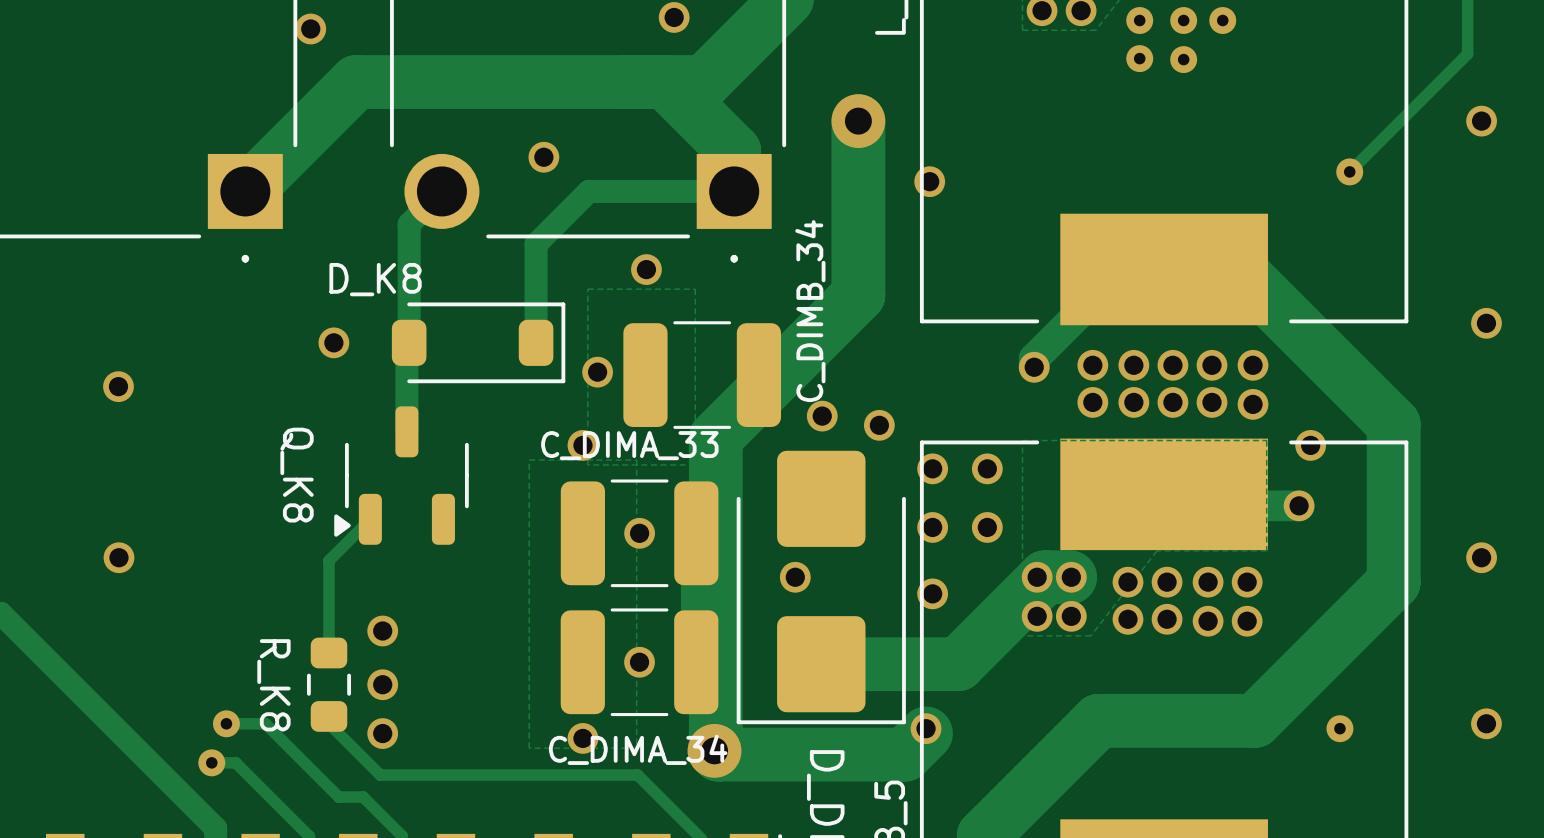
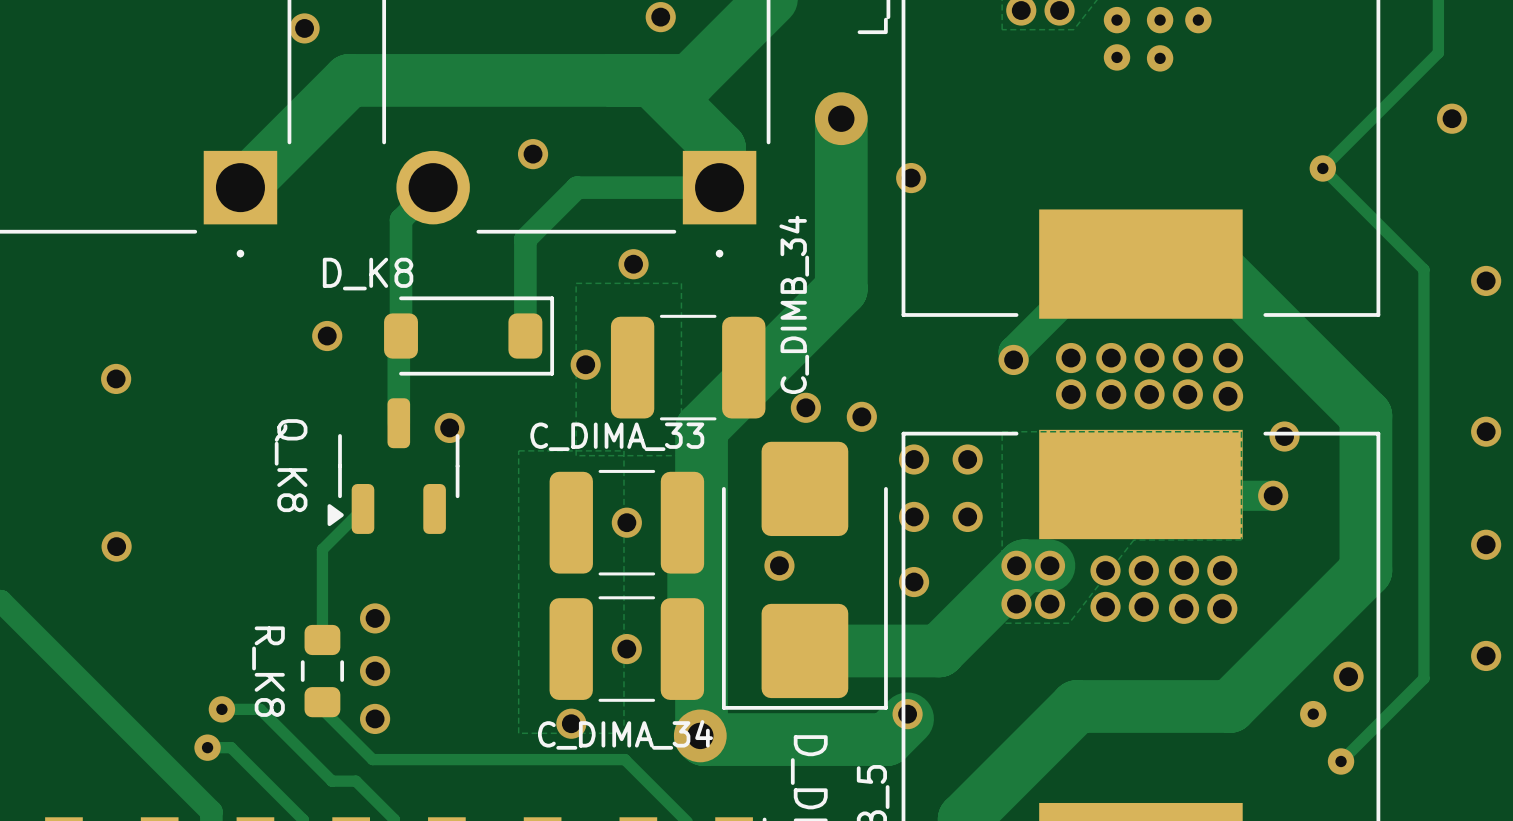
track: none -> (1322, 168) (1423, 269) (1423, 678) (1341, 761)
via position: (1486, 323) -> (1486, 280)
via: none -> (1486, 431)
via position: (582, 445) -> (449, 427)
via position: (1481, 557) -> (1486, 544)
via: none -> (1486, 655)
via: none -> (1348, 676)
via: (1486, 723) -> none
via: none -> (1341, 761)

